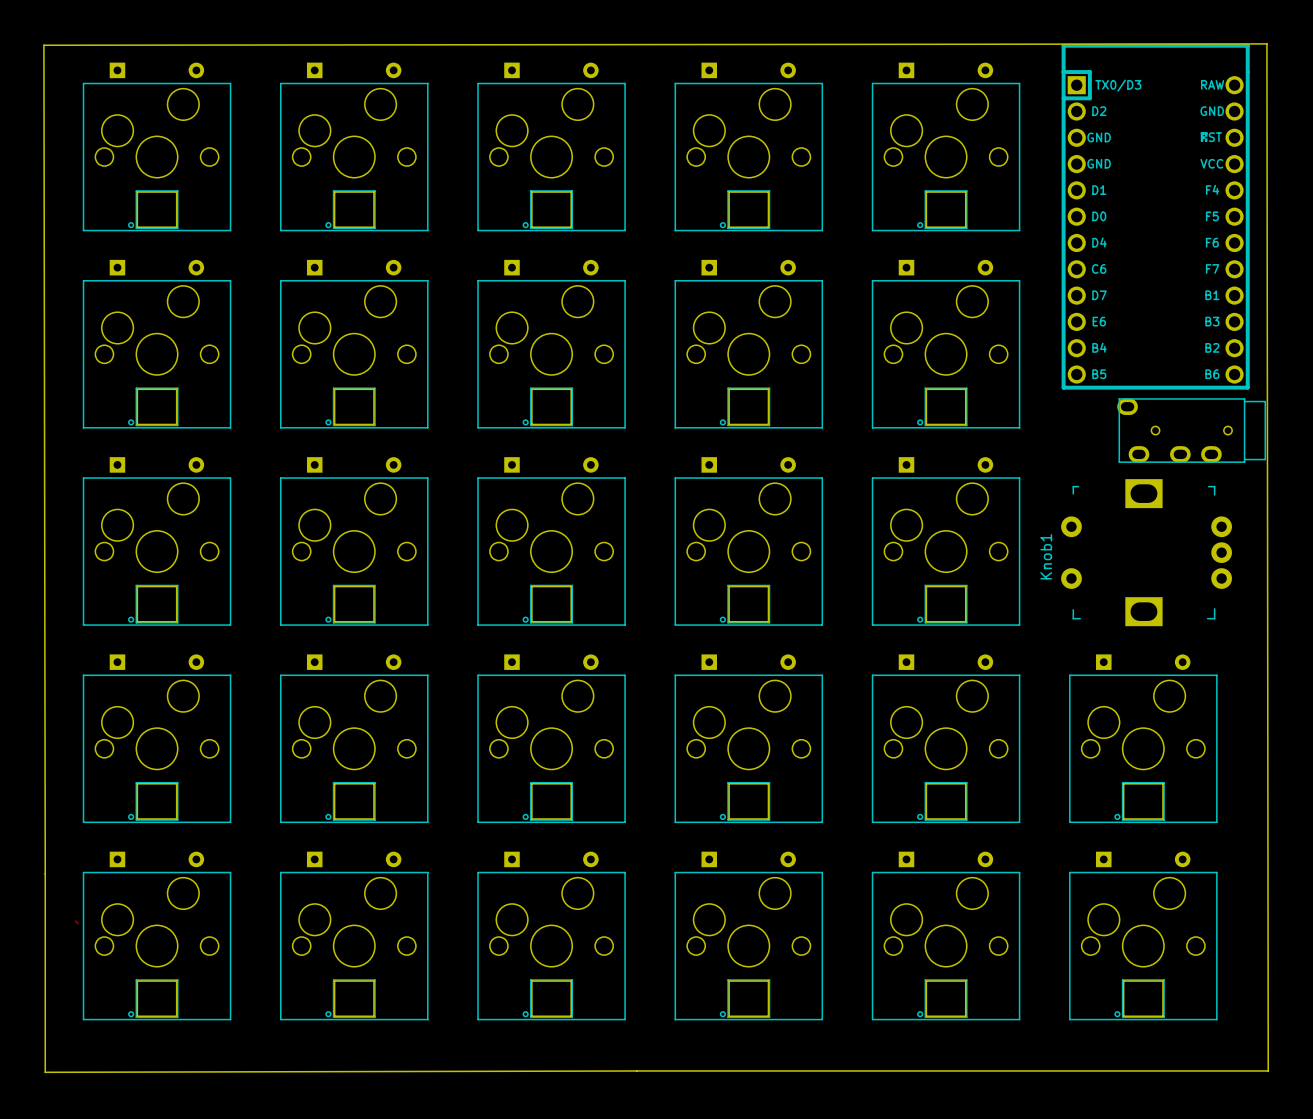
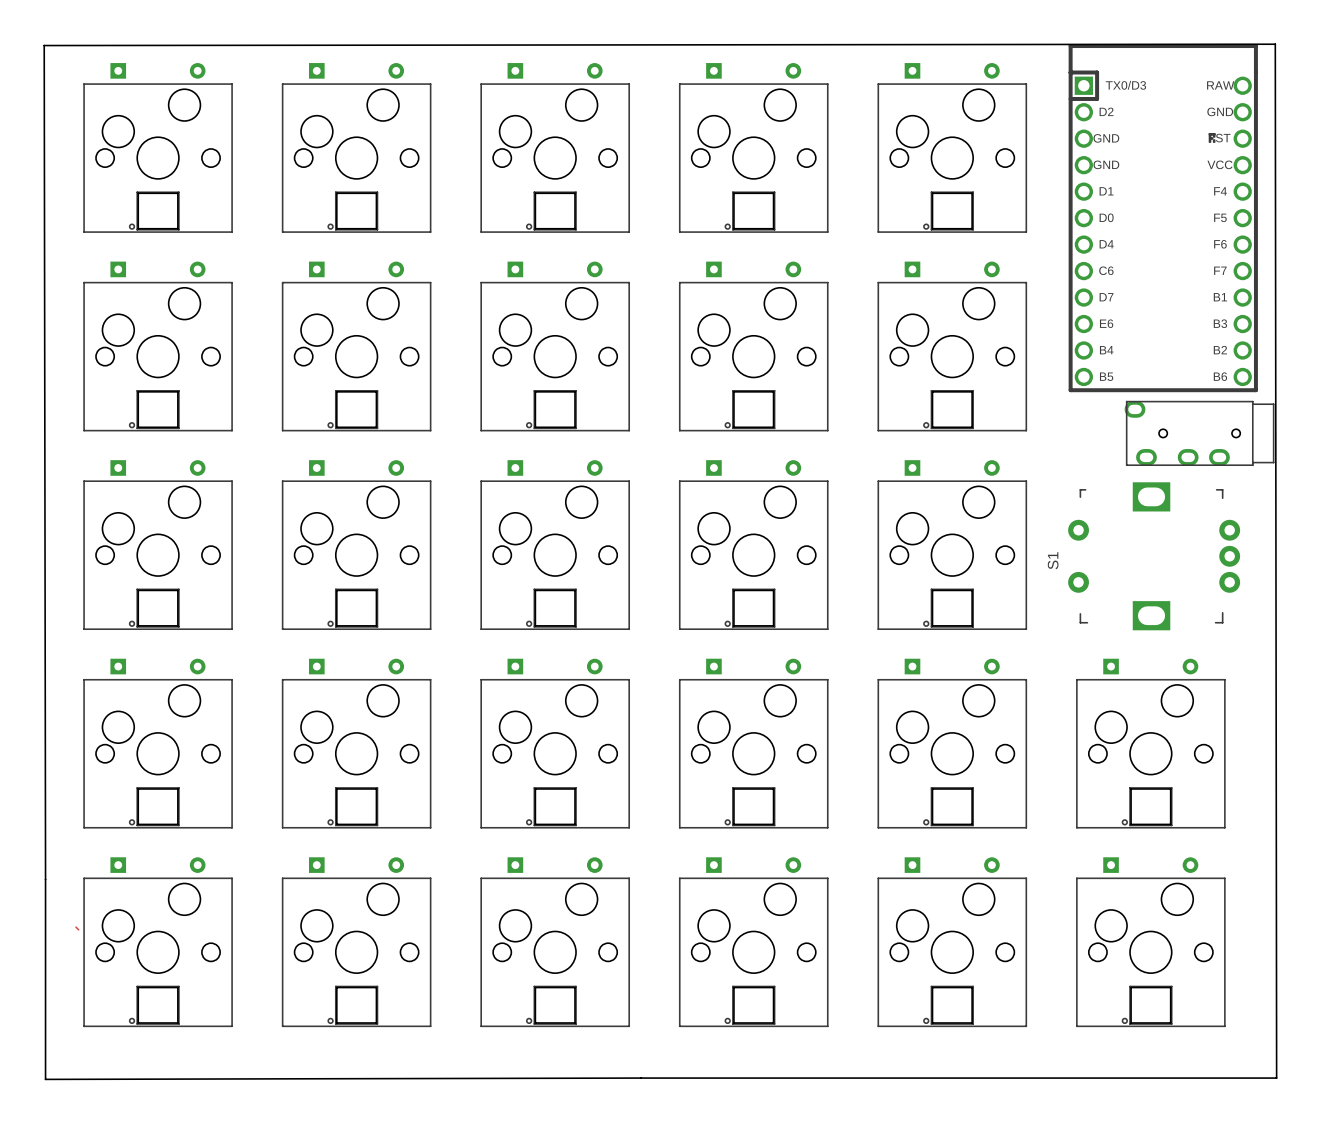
Knob1 name: Knob1 (1046, 556) -> S1 (1053, 560)

